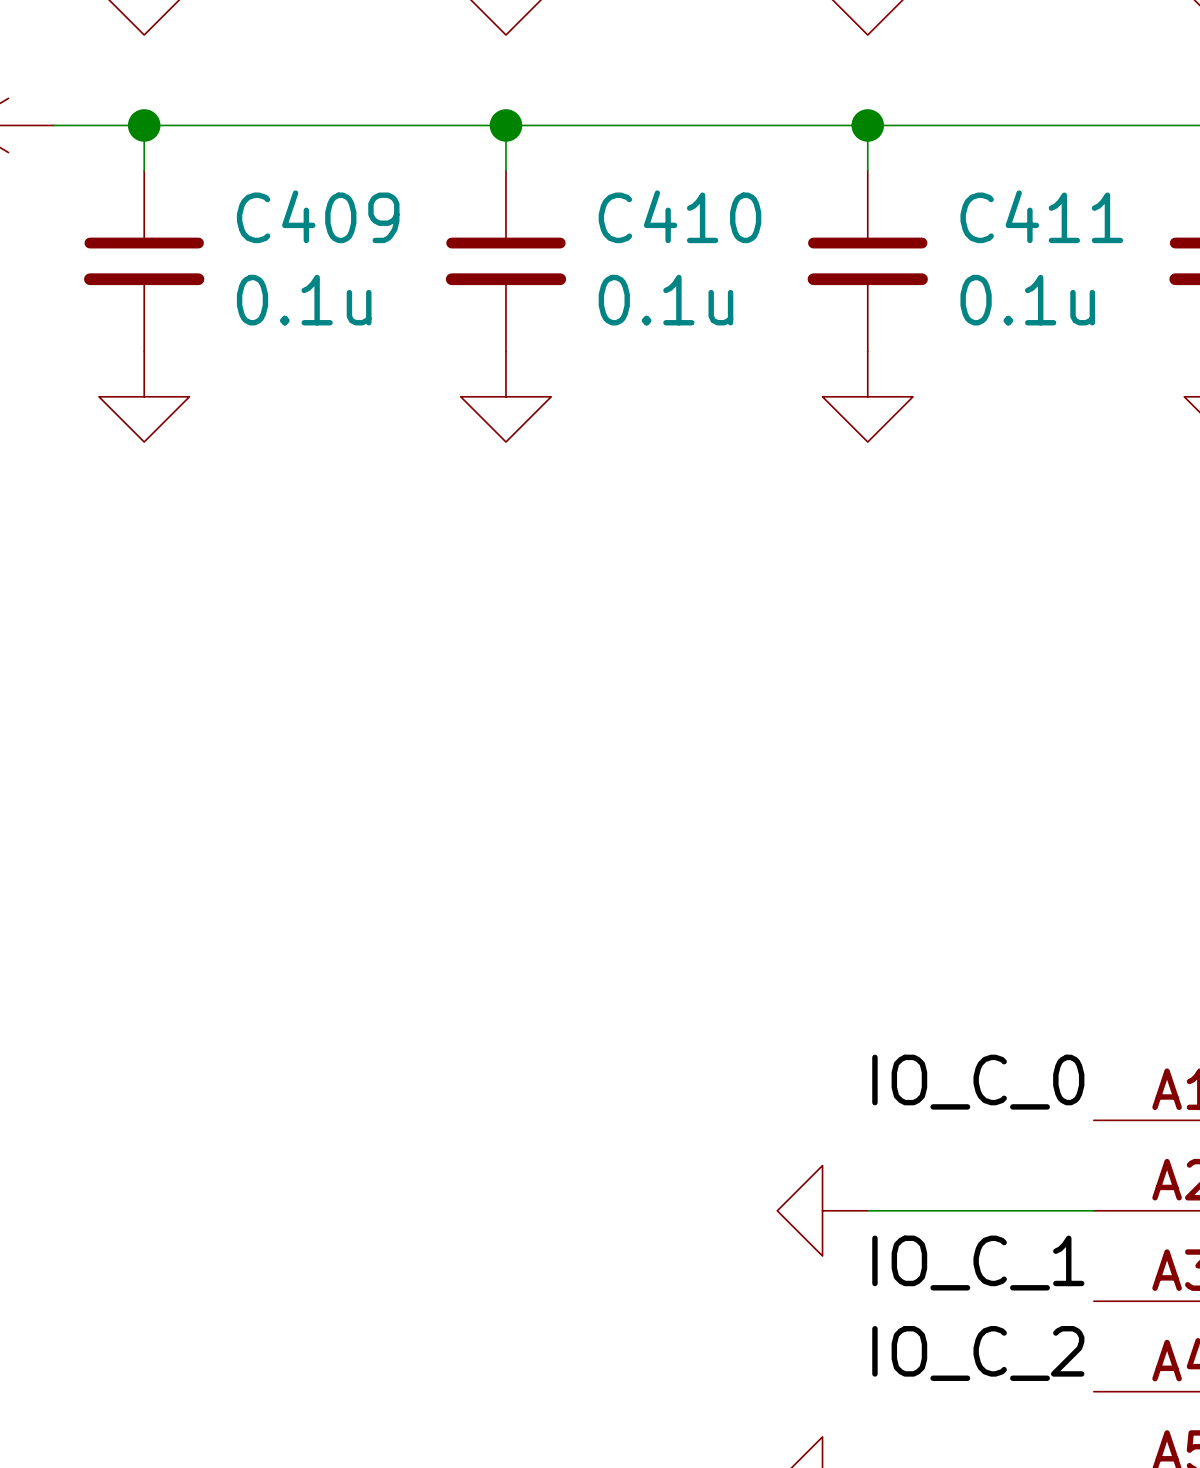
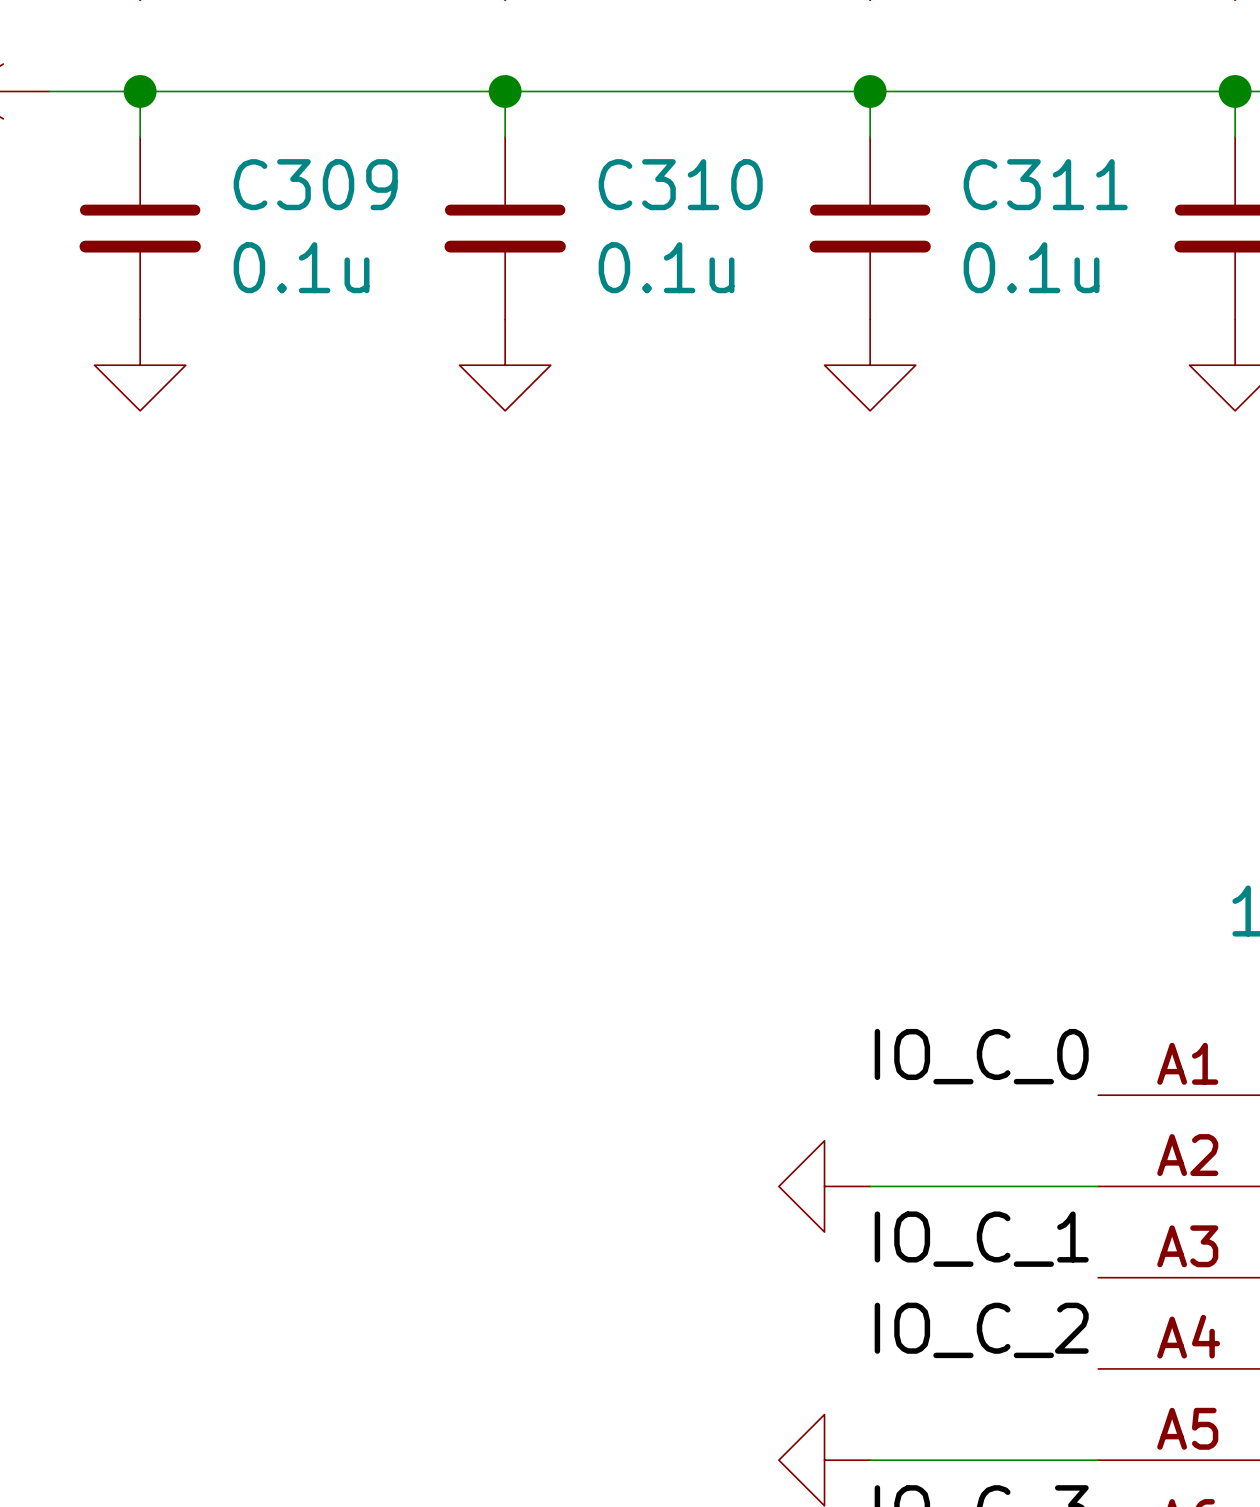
C409 name: C409 (318, 216) -> C309 (315, 184)
C410 name: C410 (679, 216) -> C310 (680, 184)
C411 name: C411 (1041, 216) -> C311 (1045, 184)

